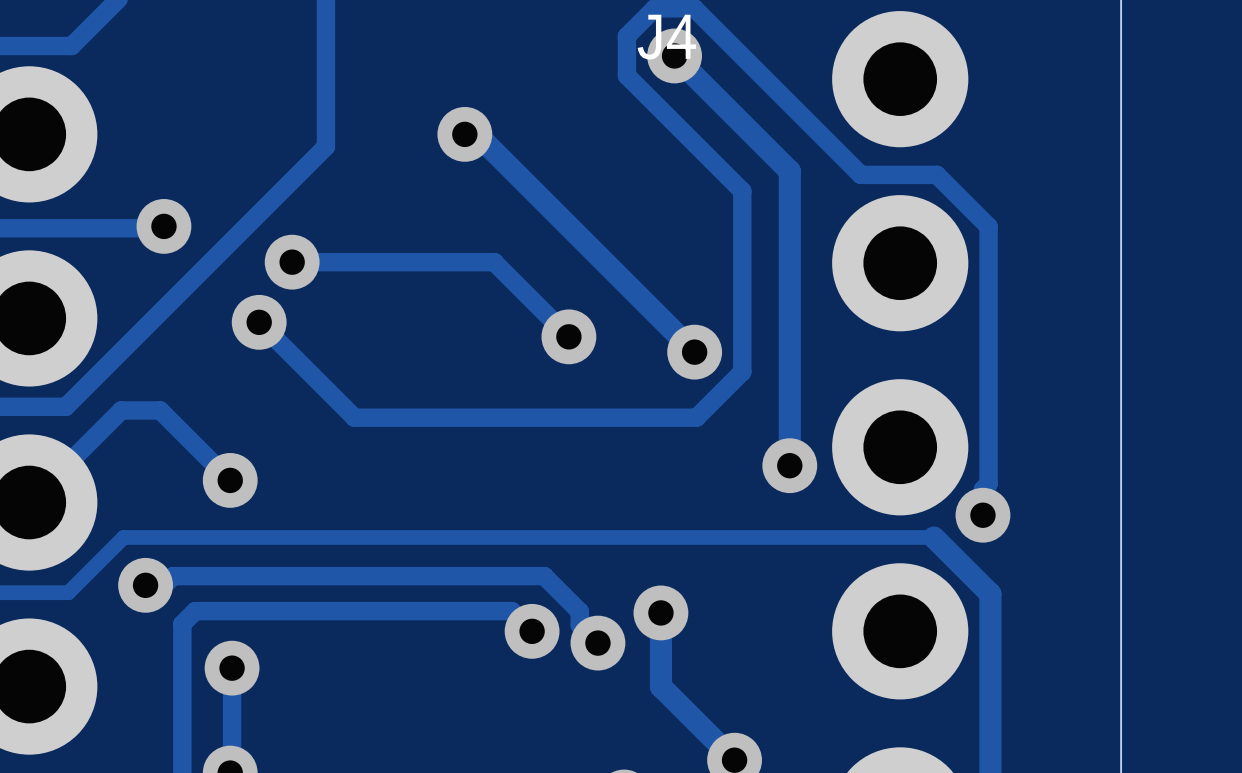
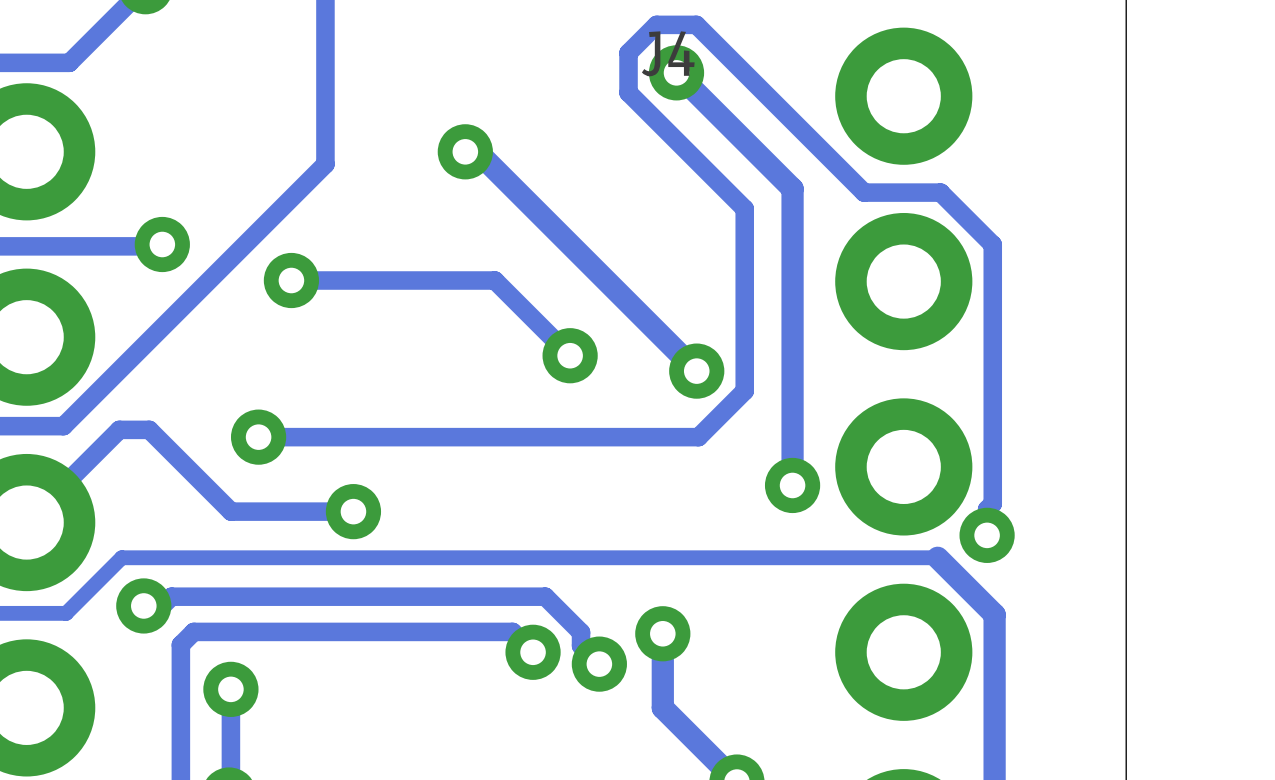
track: (259, 322) (354, 417) -> (258, 437) (354, 437)
via: (259, 322) -> none
track: (151, 410) (160, 410) (230, 480) -> (149, 429) (231, 511) (353, 511)
via: none -> (258, 437)
via: (230, 480) -> none
via: none -> (353, 511)

